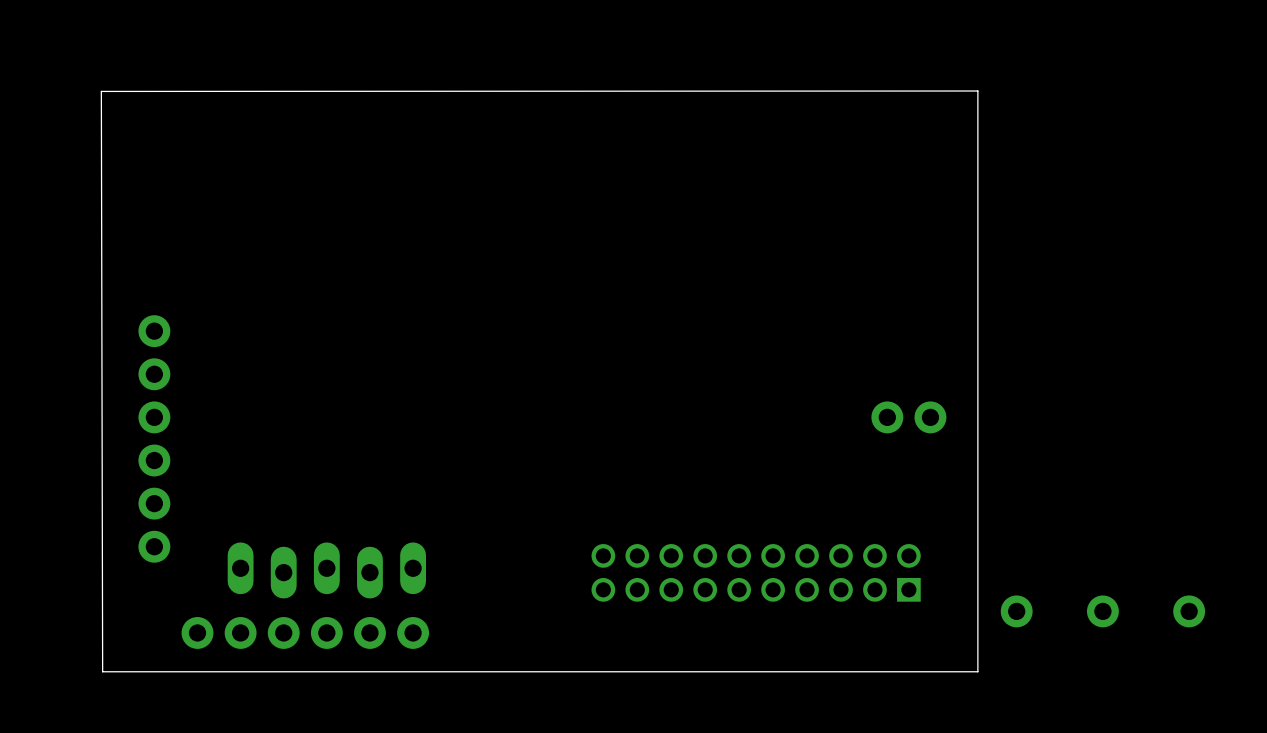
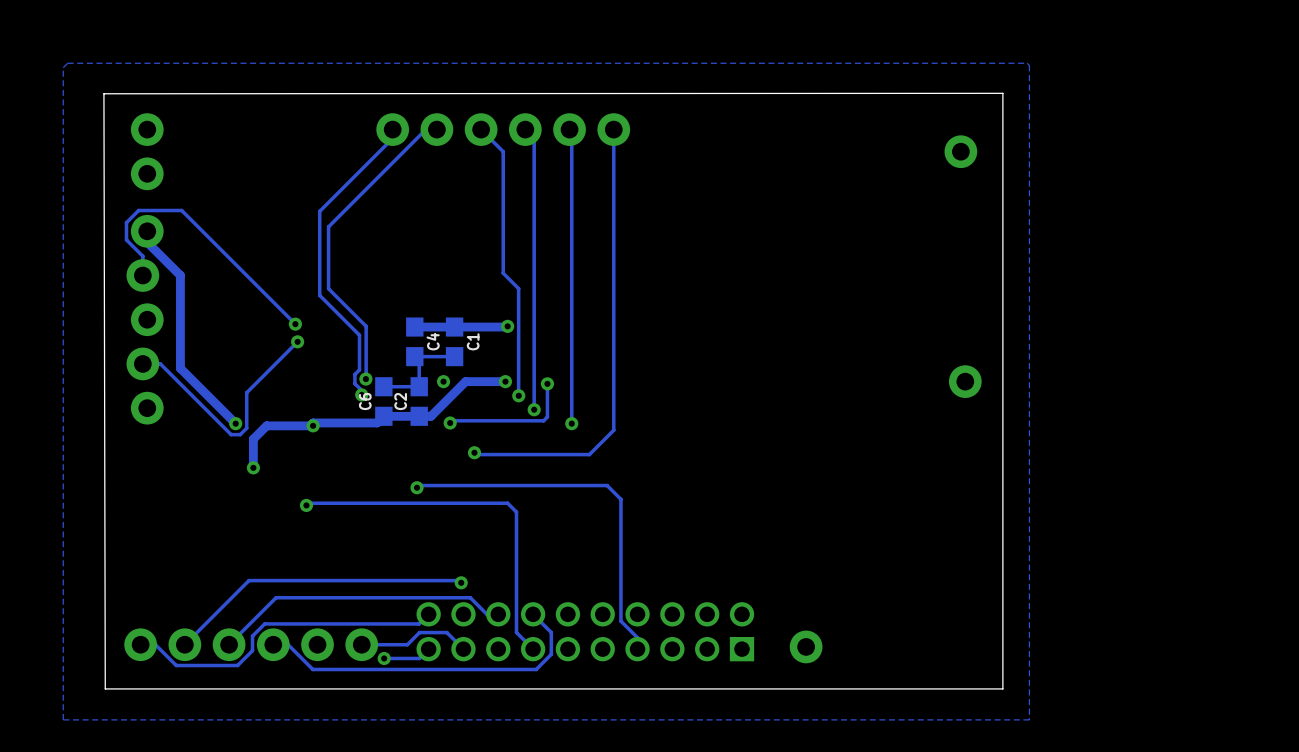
zone outline: none -> (1027, 63) (67, 63) (63, 67) (63, 719) (1029, 719) (1029, 65) (1027, 63)
track: none -> (392, 129) (392, 138) (319, 211) (319, 295) (359, 335) (359, 369) (354, 374) (354, 383) (360, 389) (360, 396) (361, 394)
track: none -> (436, 129) (425, 129) (328, 226) (328, 288) (366, 326) (365, 379)
track: none -> (481, 129) (503, 151) (503, 273) (518, 288) (518, 395)
part: none -> (503, 129)
track: none -> (525, 129) (534, 138) (534, 409)
track: none -> (569, 129) (571, 131) (571, 423)
track: none -> (613, 129) (613, 430) (589, 454) (474, 454) (474, 452)
part: none -> (147, 151)
part: none -> (960, 151)
track: none -> (147, 231) (147, 242) (180, 275) (180, 368) (235, 423)
track: none -> (142, 275) (142, 256) (126, 239) (126, 222) (138, 210) (181, 210) (295, 324)
part: none -> (145, 319)
via: none -> (295, 324)
track: none -> (507, 326) (414, 327)
via: none -> (507, 326)
track: none -> (297, 341) (246, 392) (246, 428) (240, 434) (231, 434) (160, 363) (142, 363)
via: none -> (297, 341)
C4: none -> (414, 341)
C1: none -> (454, 341)
track: none -> (454, 356) (414, 356) (419, 361) (419, 386) (383, 386)
via: none -> (365, 379)
via: none -> (443, 381)
track: none -> (505, 381) (465, 381) (430, 416) (383, 416) (377, 422) (313, 422) (313, 425) (266, 425) (253, 439) (253, 467)
via: none -> (505, 381)
part: none -> (965, 381)
track: none -> (547, 383) (547, 417) (543, 420) (452, 420) (450, 423)
via: none -> (547, 383)
via: none -> (361, 394)
via: none -> (518, 395)
C6: none -> (383, 401)
C2: none -> (419, 401)
via: none -> (534, 409)
via: none -> (450, 423)
via: none -> (235, 423)
via: none -> (571, 423)
via: none -> (313, 425)
part: (908, 417) -> none
part: (154, 438) -> none
via: none -> (474, 452)
via: none -> (253, 467)
track: none -> (417, 487) (417, 485) (607, 485) (620, 499) (620, 621) (637, 637) (637, 649)
via: none -> (417, 487)
track: none -> (306, 505) (306, 503) (507, 503) (516, 512) (516, 632) (533, 649)
via: none -> (306, 505)
track: none -> (461, 582) (461, 580) (248, 580) (184, 644)
via: none -> (461, 582)
part: (326, 570) -> none
part position: (756, 572) -> (585, 631)
track: none -> (428, 614) (419, 623) (264, 623) (252, 636) (252, 650) (237, 665) (176, 665) (155, 644) (140, 644)
track: none -> (498, 614) (486, 614) (470, 597) (276, 597) (229, 644)
track: none -> (533, 614) (551, 632) (551, 654) (536, 669) (312, 669) (288, 644) (273, 644)
part: (1016, 611) -> none
part: (1102, 611) -> none
part: (1189, 611) -> none
track: none -> (361, 644) (407, 644) (419, 632) (446, 632) (463, 649)
part: none -> (806, 646)
part position: (305, 632) -> (251, 644)
track: none -> (428, 649) (419, 658) (384, 658)
via: none -> (384, 658)

